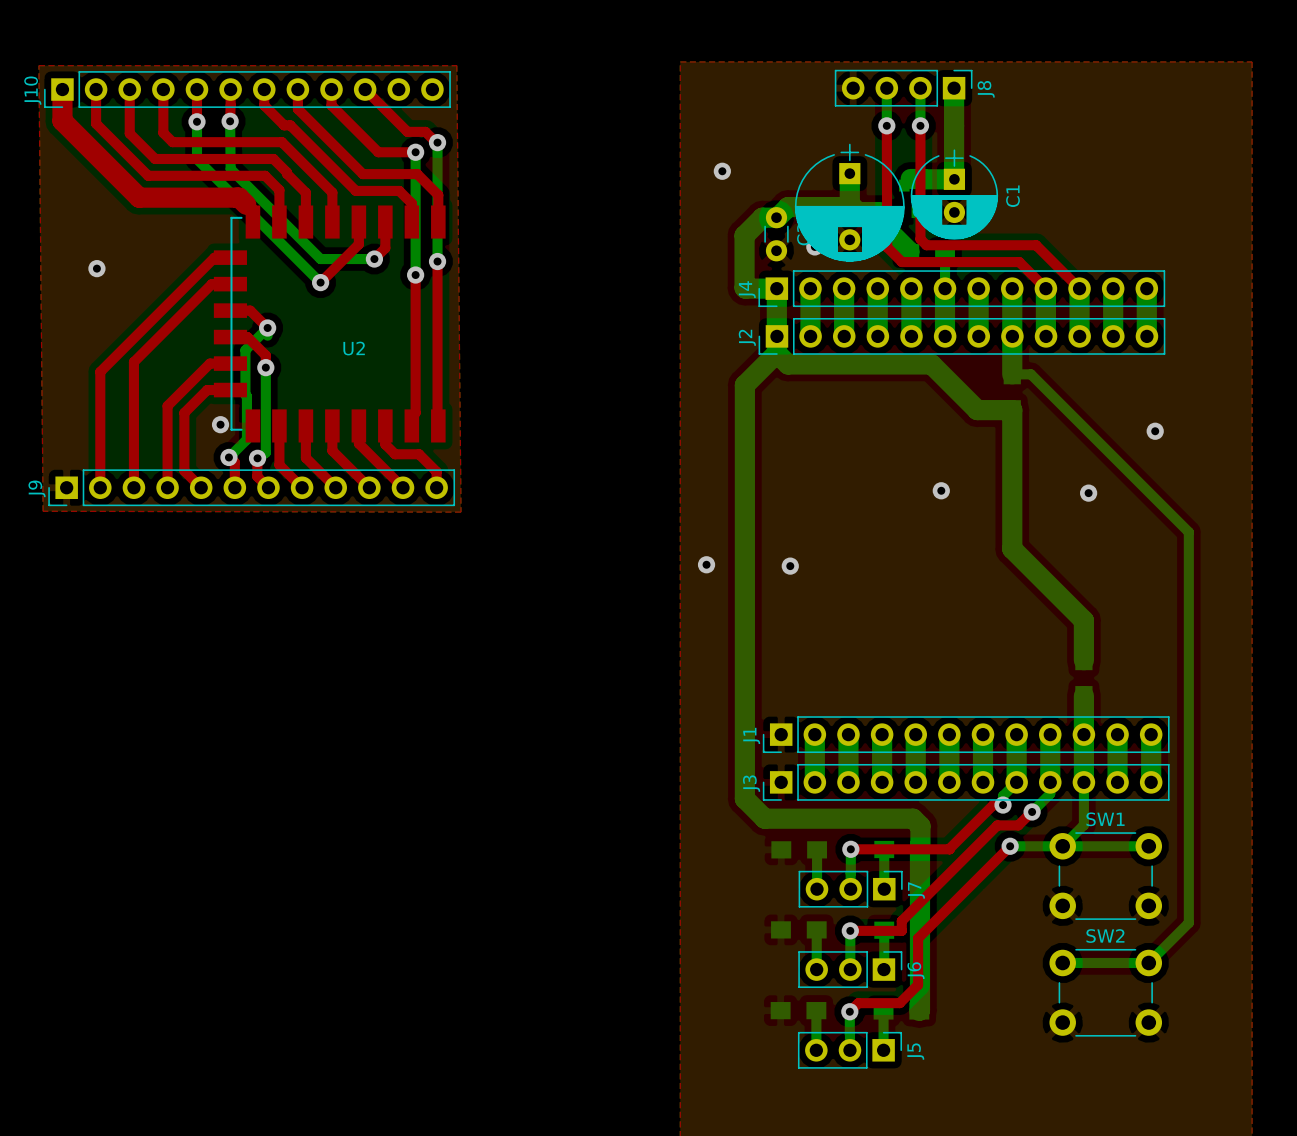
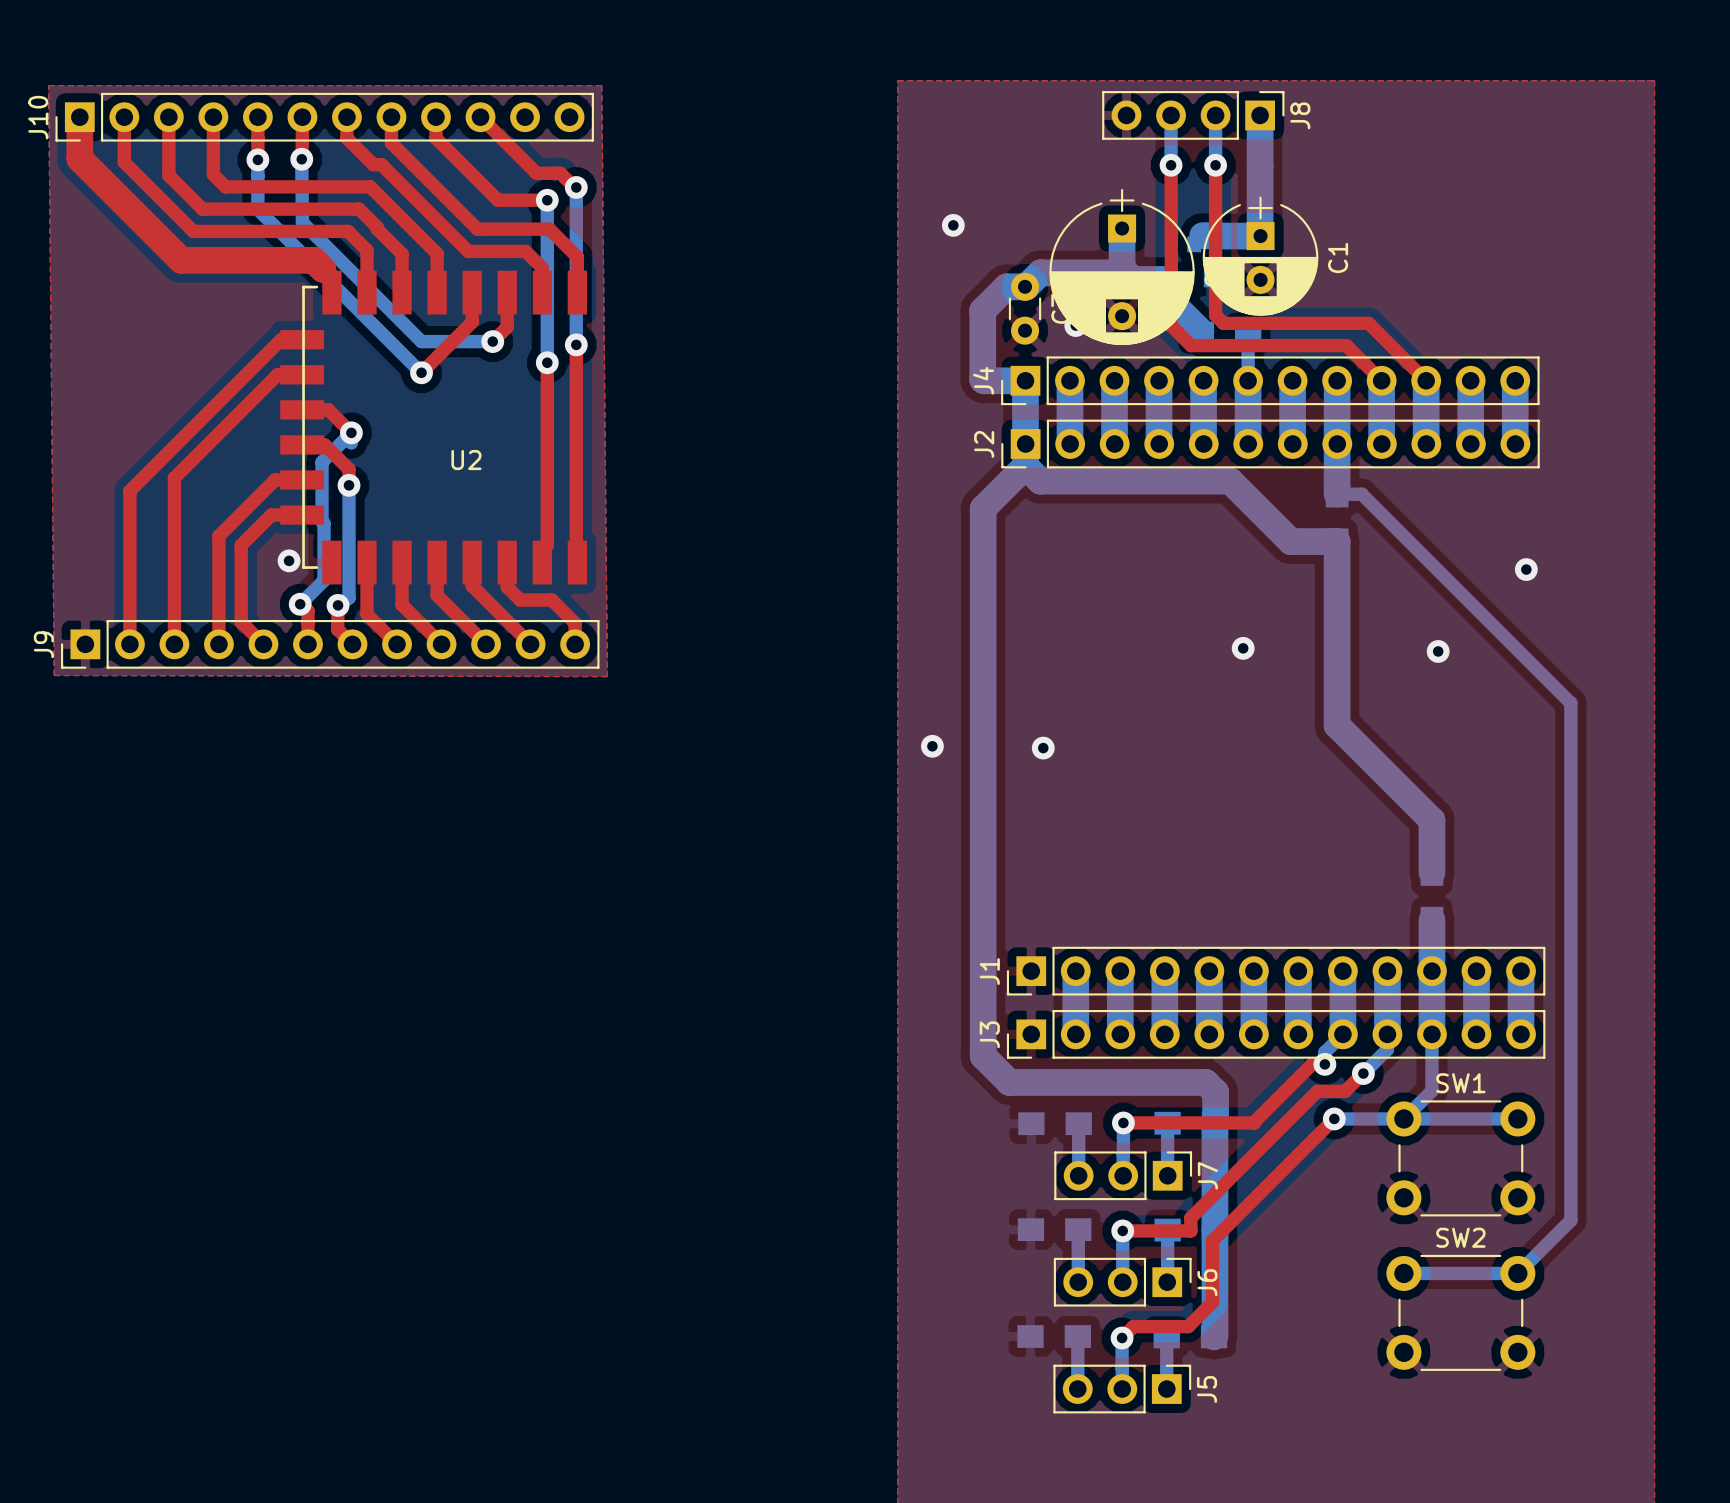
via: (96, 268) -> none

